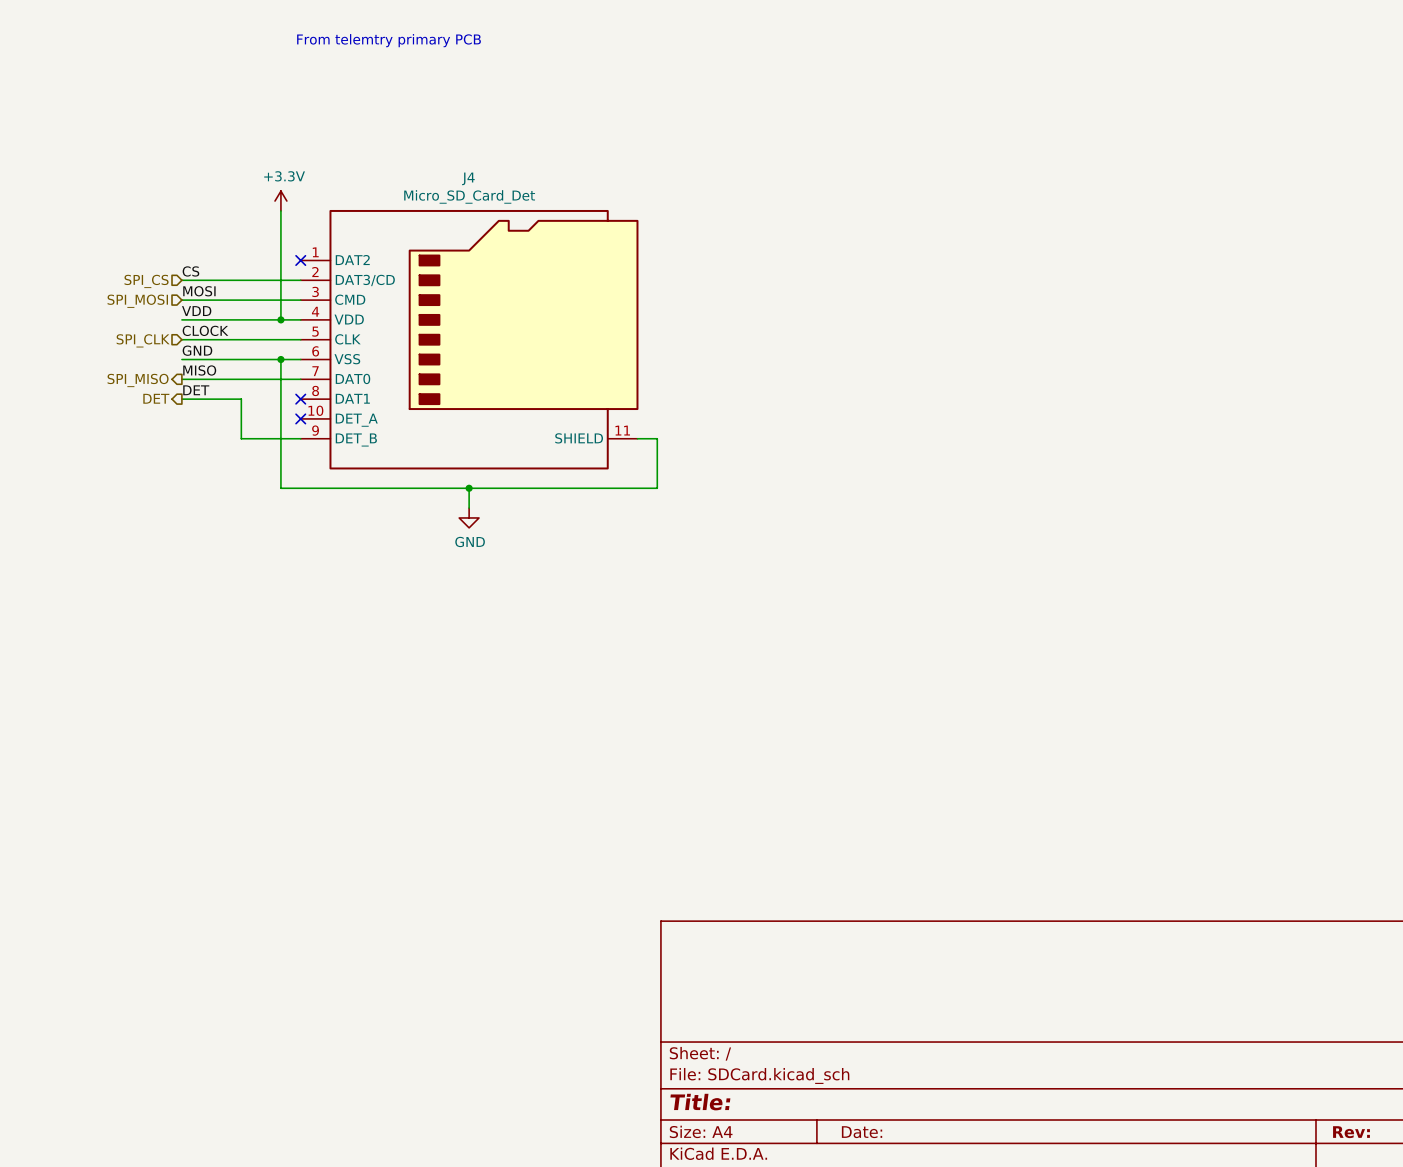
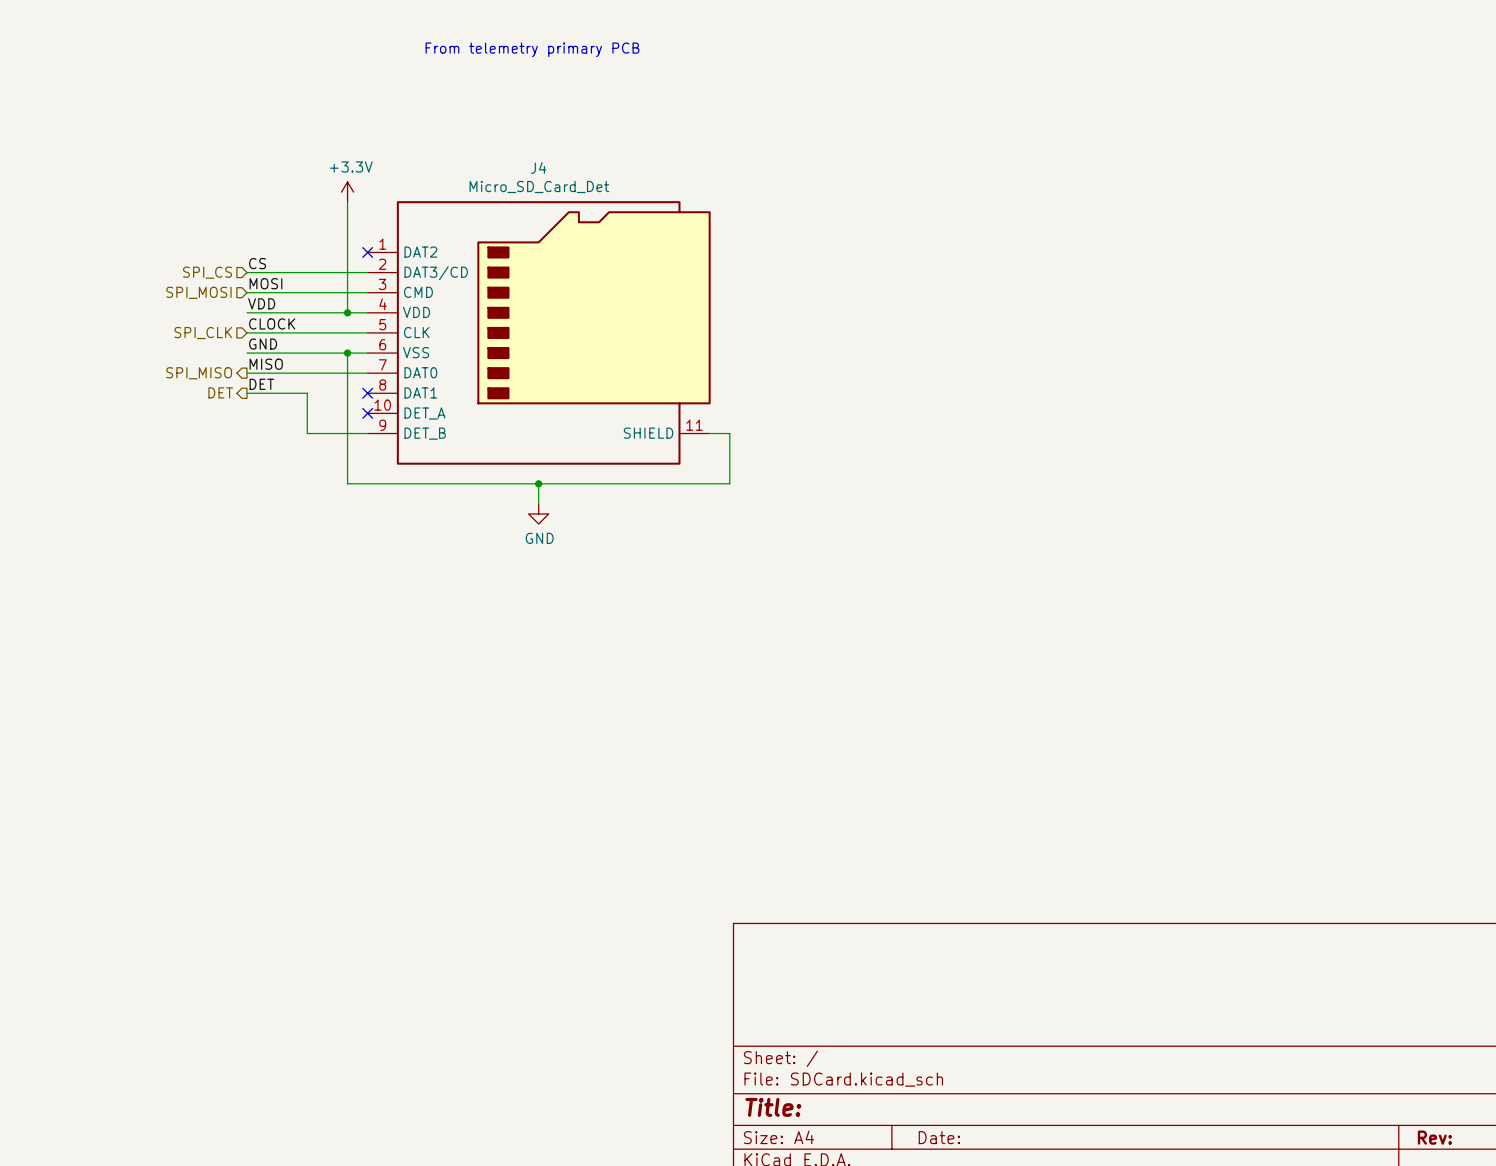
text: From telemtry primary PCB (389, 40) -> From telemetry primary PCB (532, 49)

